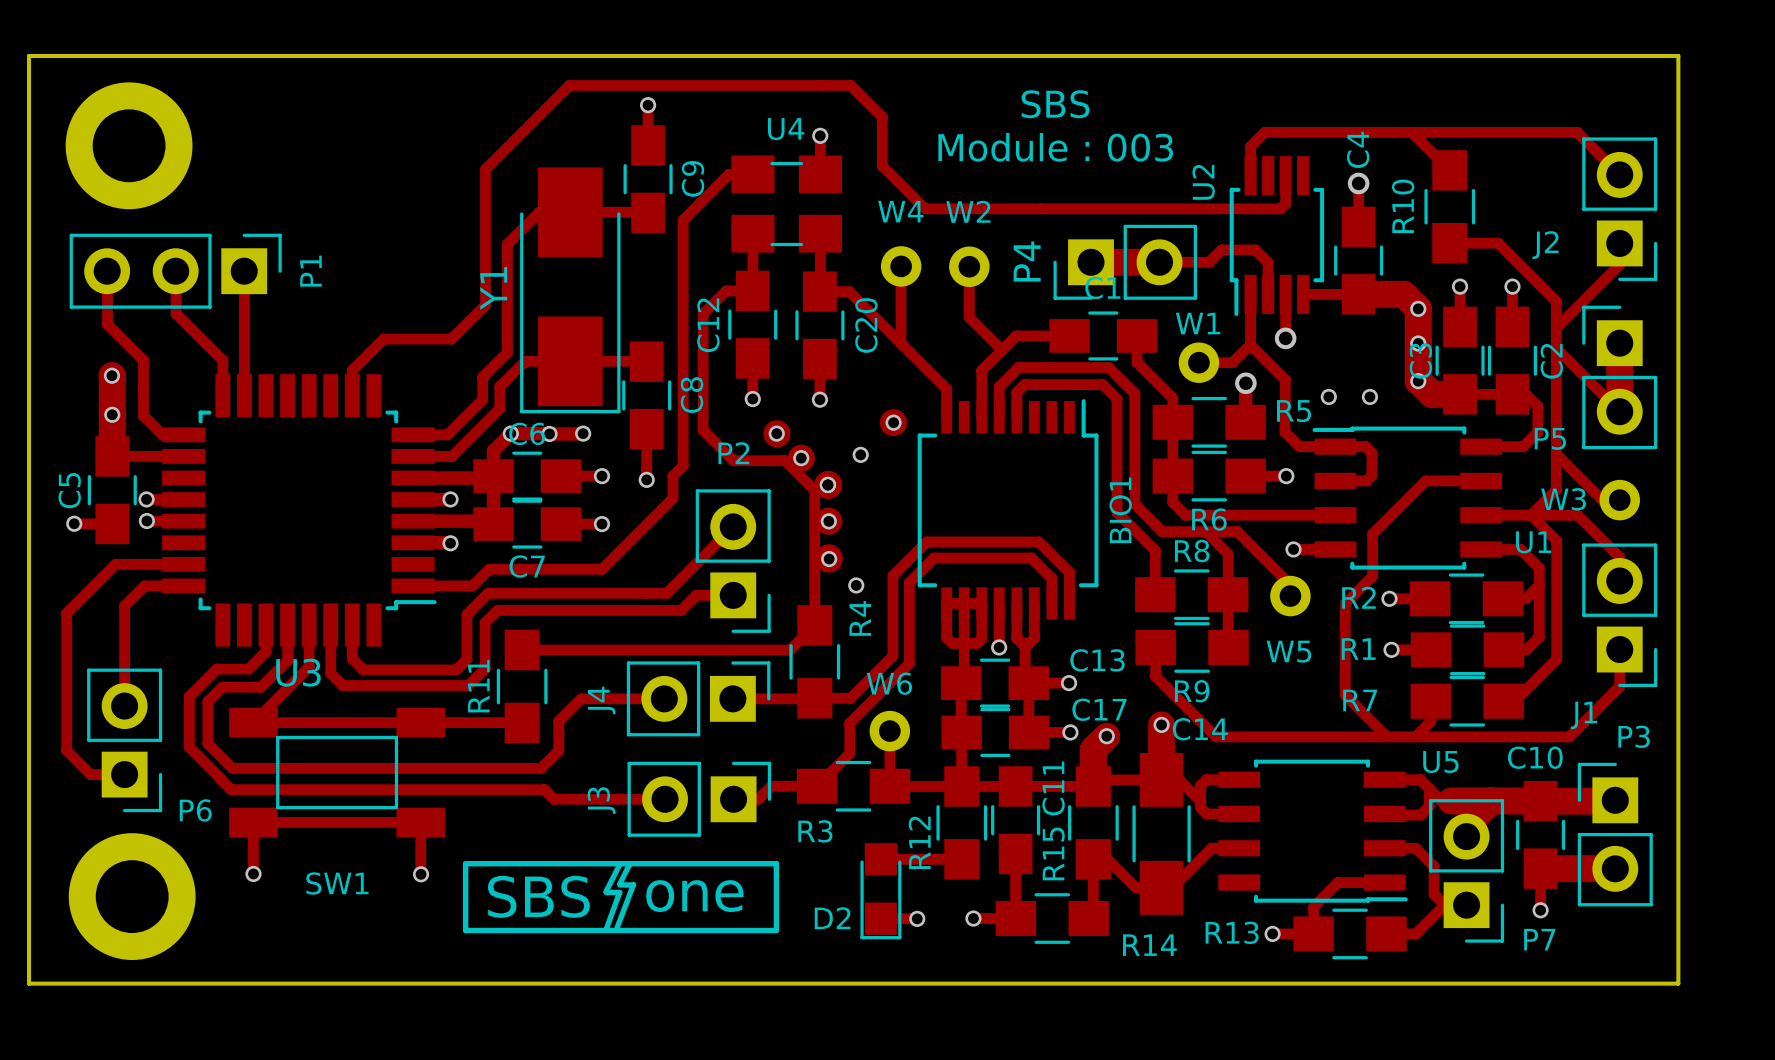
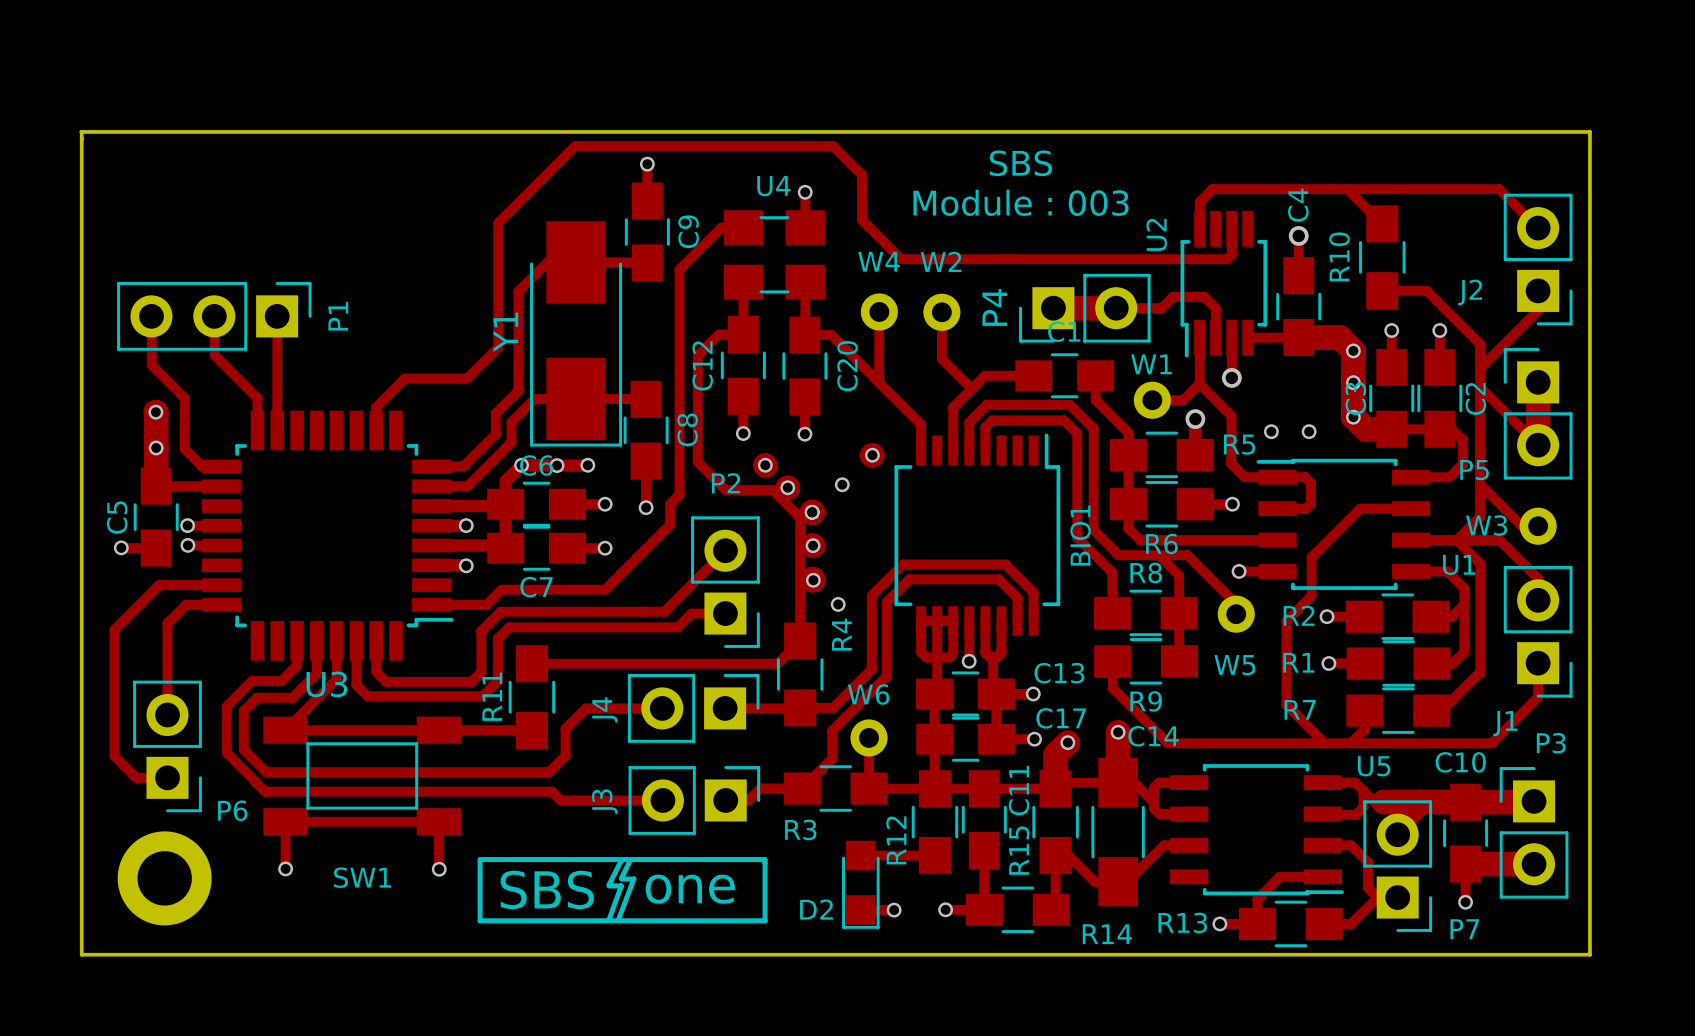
board edge: (29, 56) (29, 983) (1678, 983) (1678, 56) (29, 56) -> (81, 131) (1589, 131) (1589, 954) (81, 954) (81, 132)
part: (129, 145) -> none
part footprint: [68, 833, 196, 961] -> [117, 831, 212, 926]

